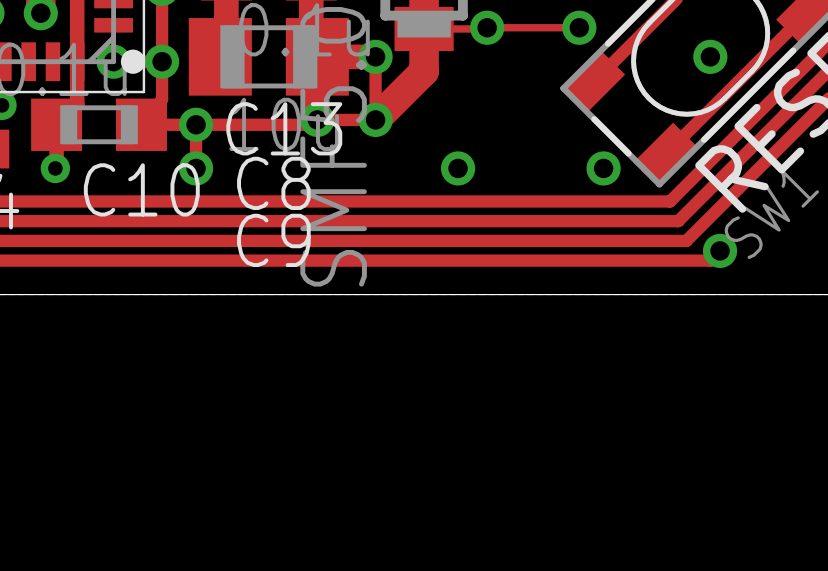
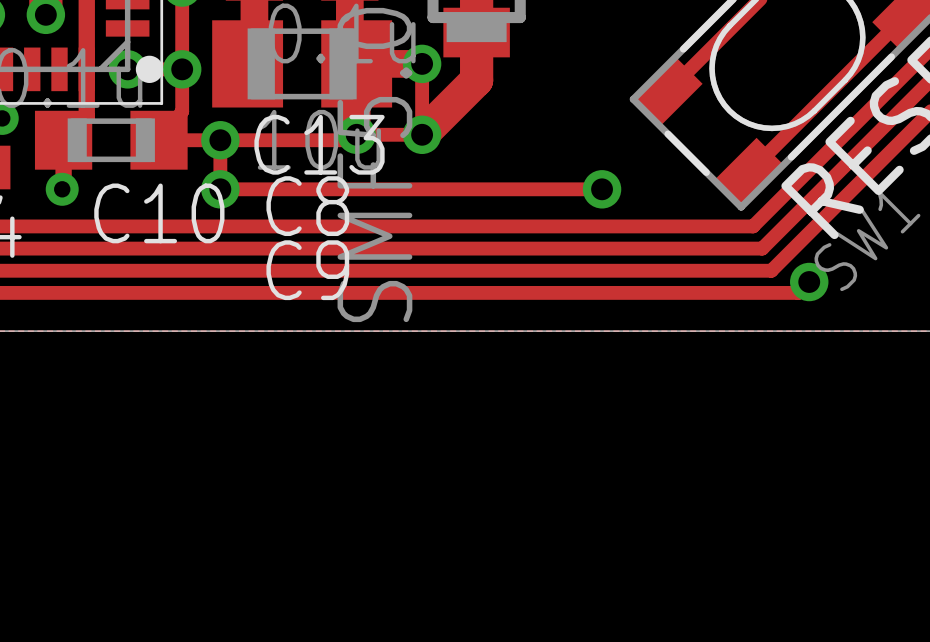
via: (487, 27) -> none
track: (579, 27) (424, 28) -> none
via: (579, 27) -> none
via: (710, 56) -> none
track: none -> (220, 189) (602, 189)
via: (458, 168) -> none
via: none -> (602, 189)
via: (603, 168) -> none

